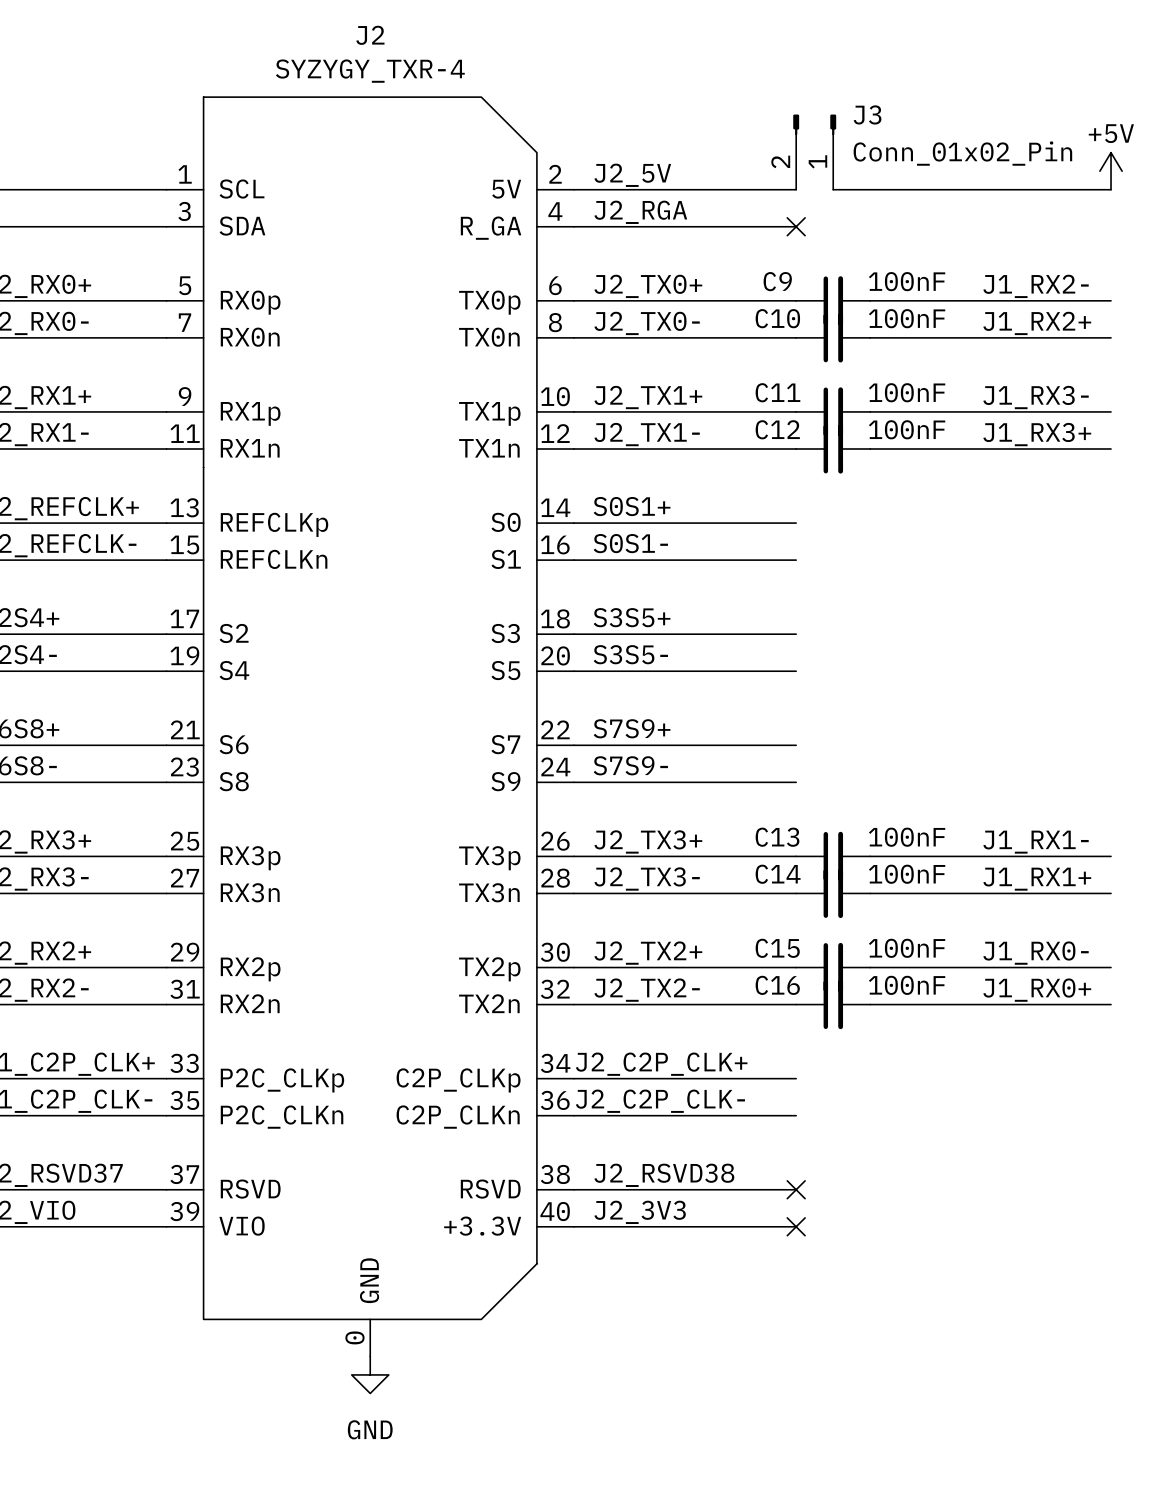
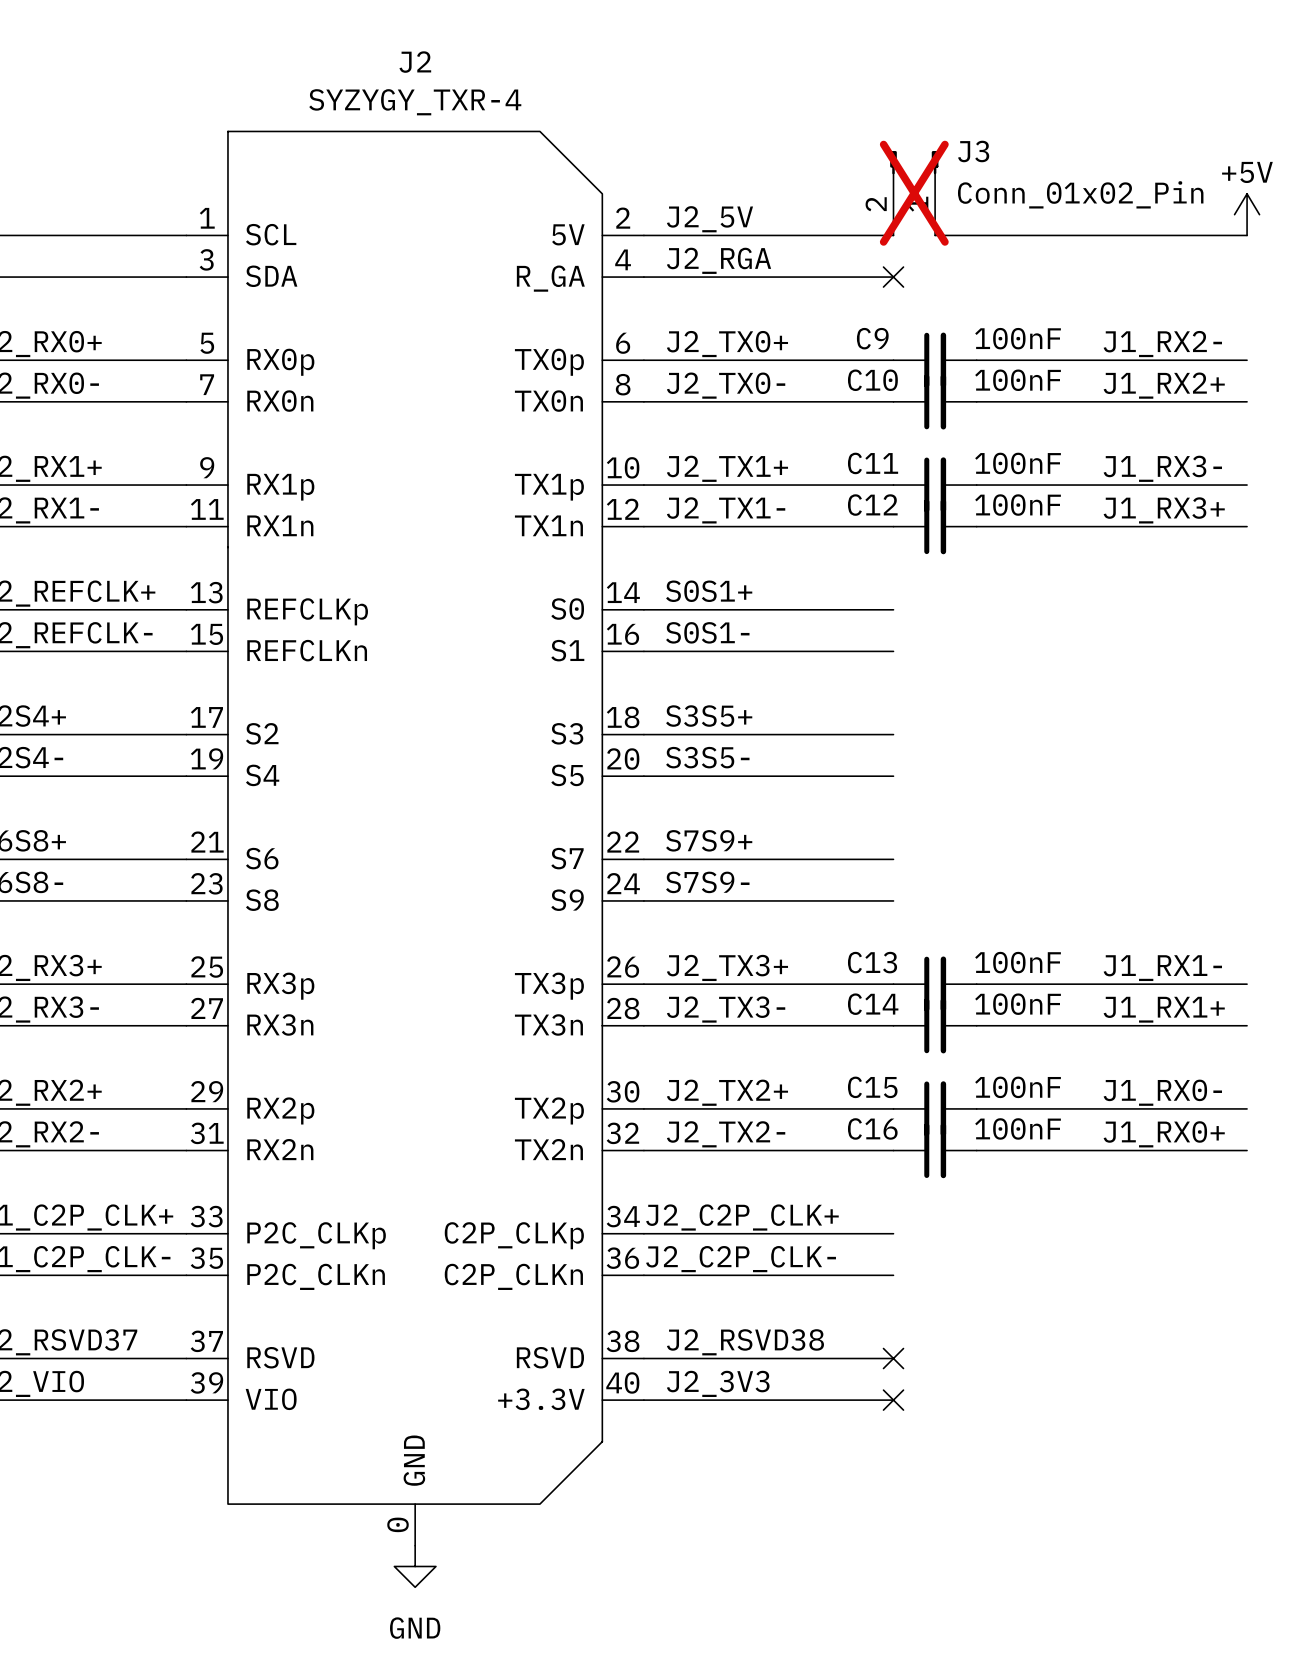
J3 do-not-place cross: none -> (914, 193)

